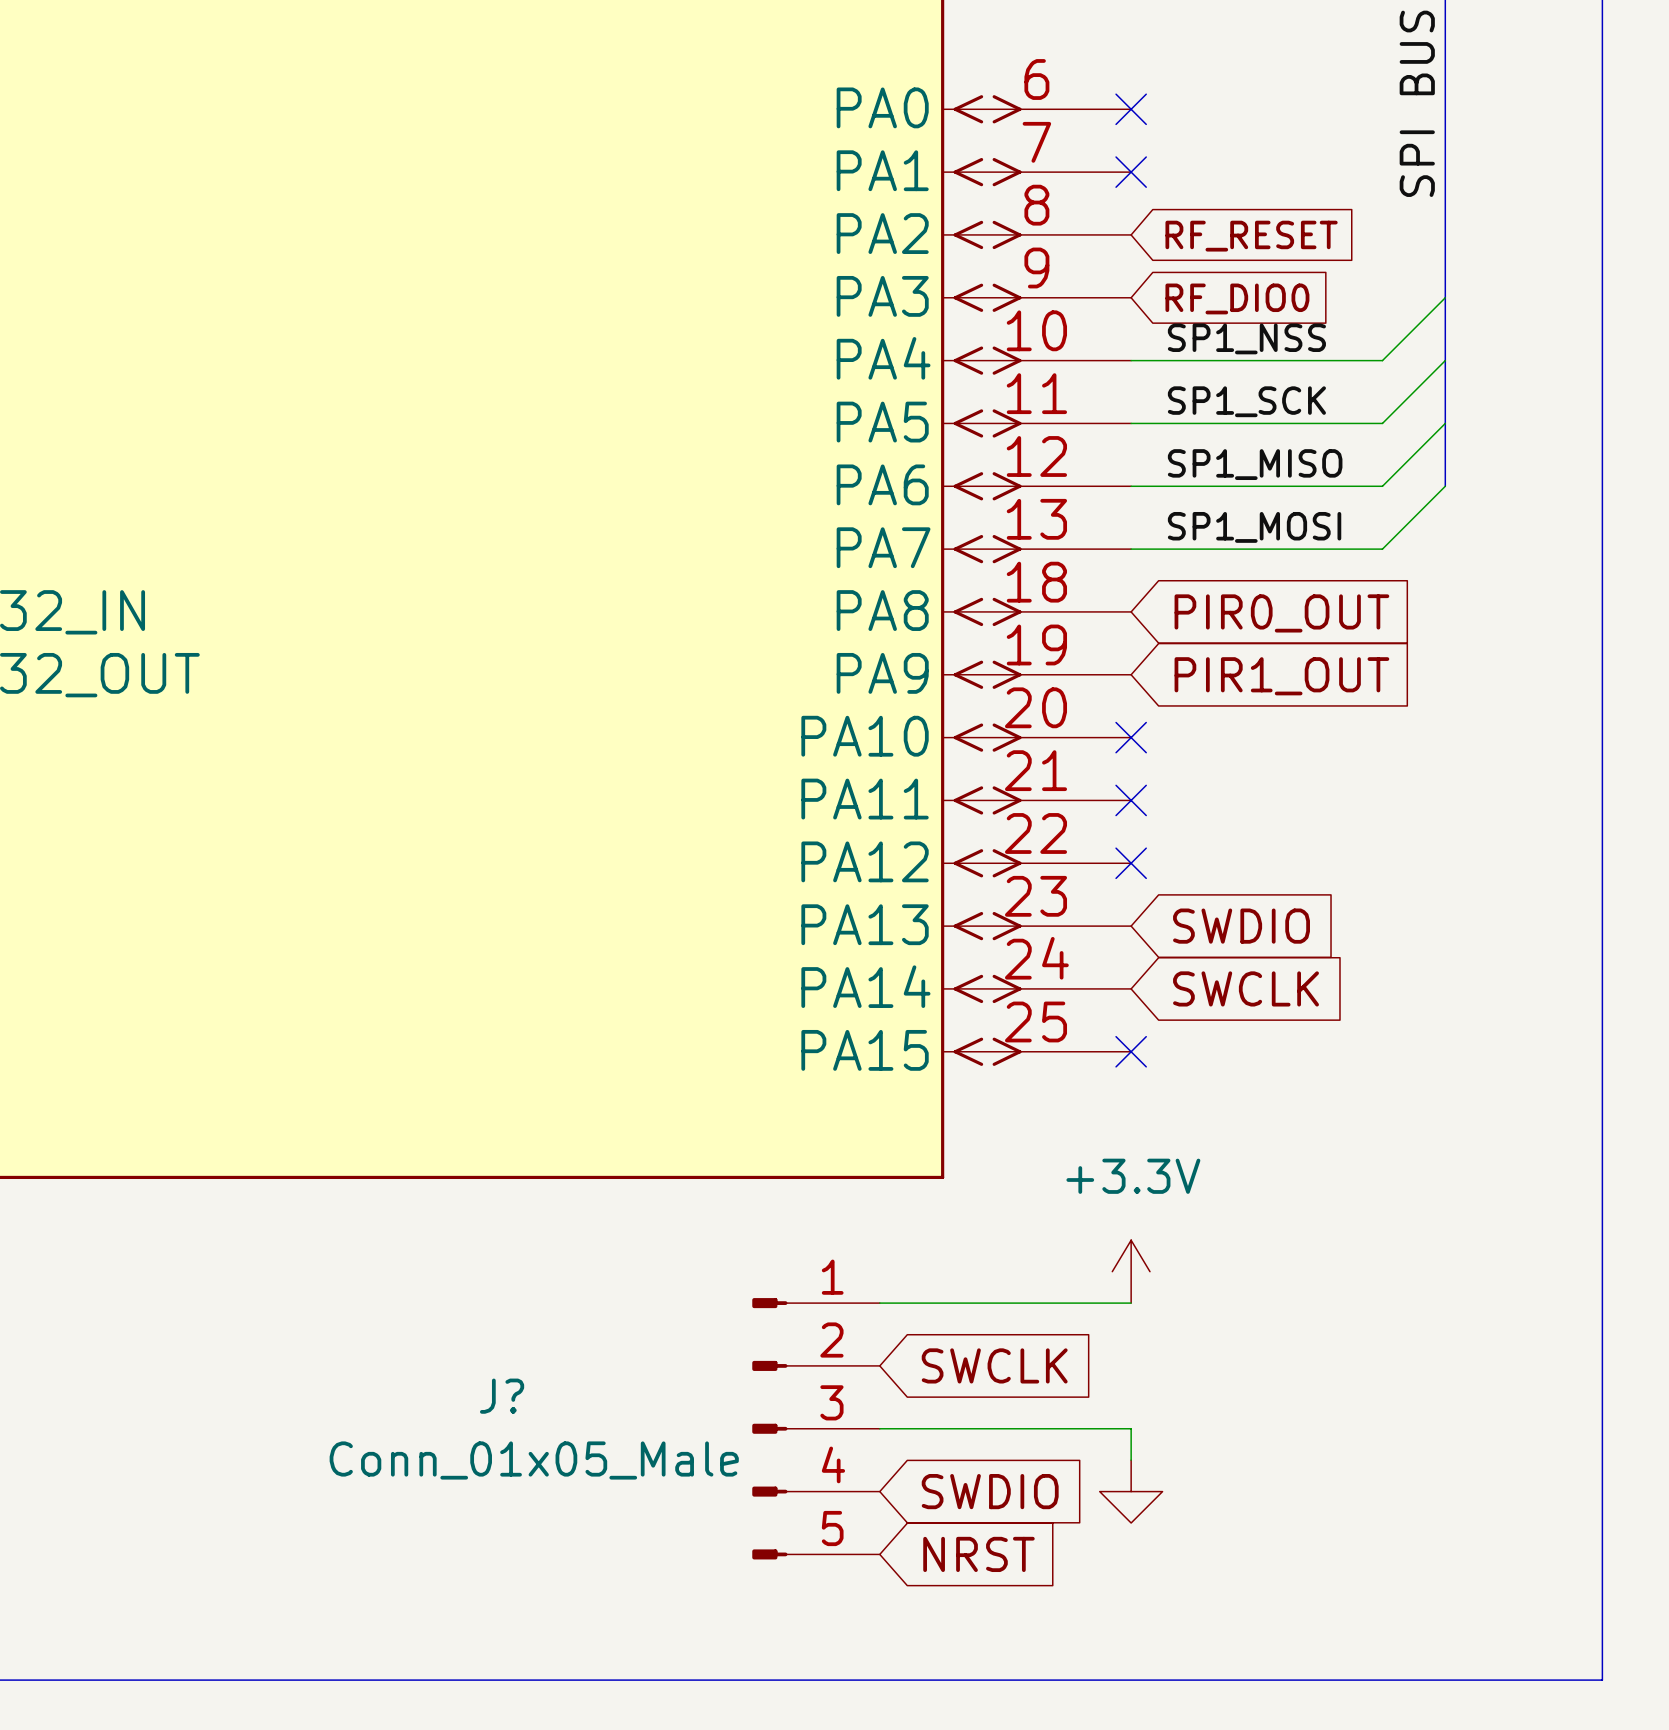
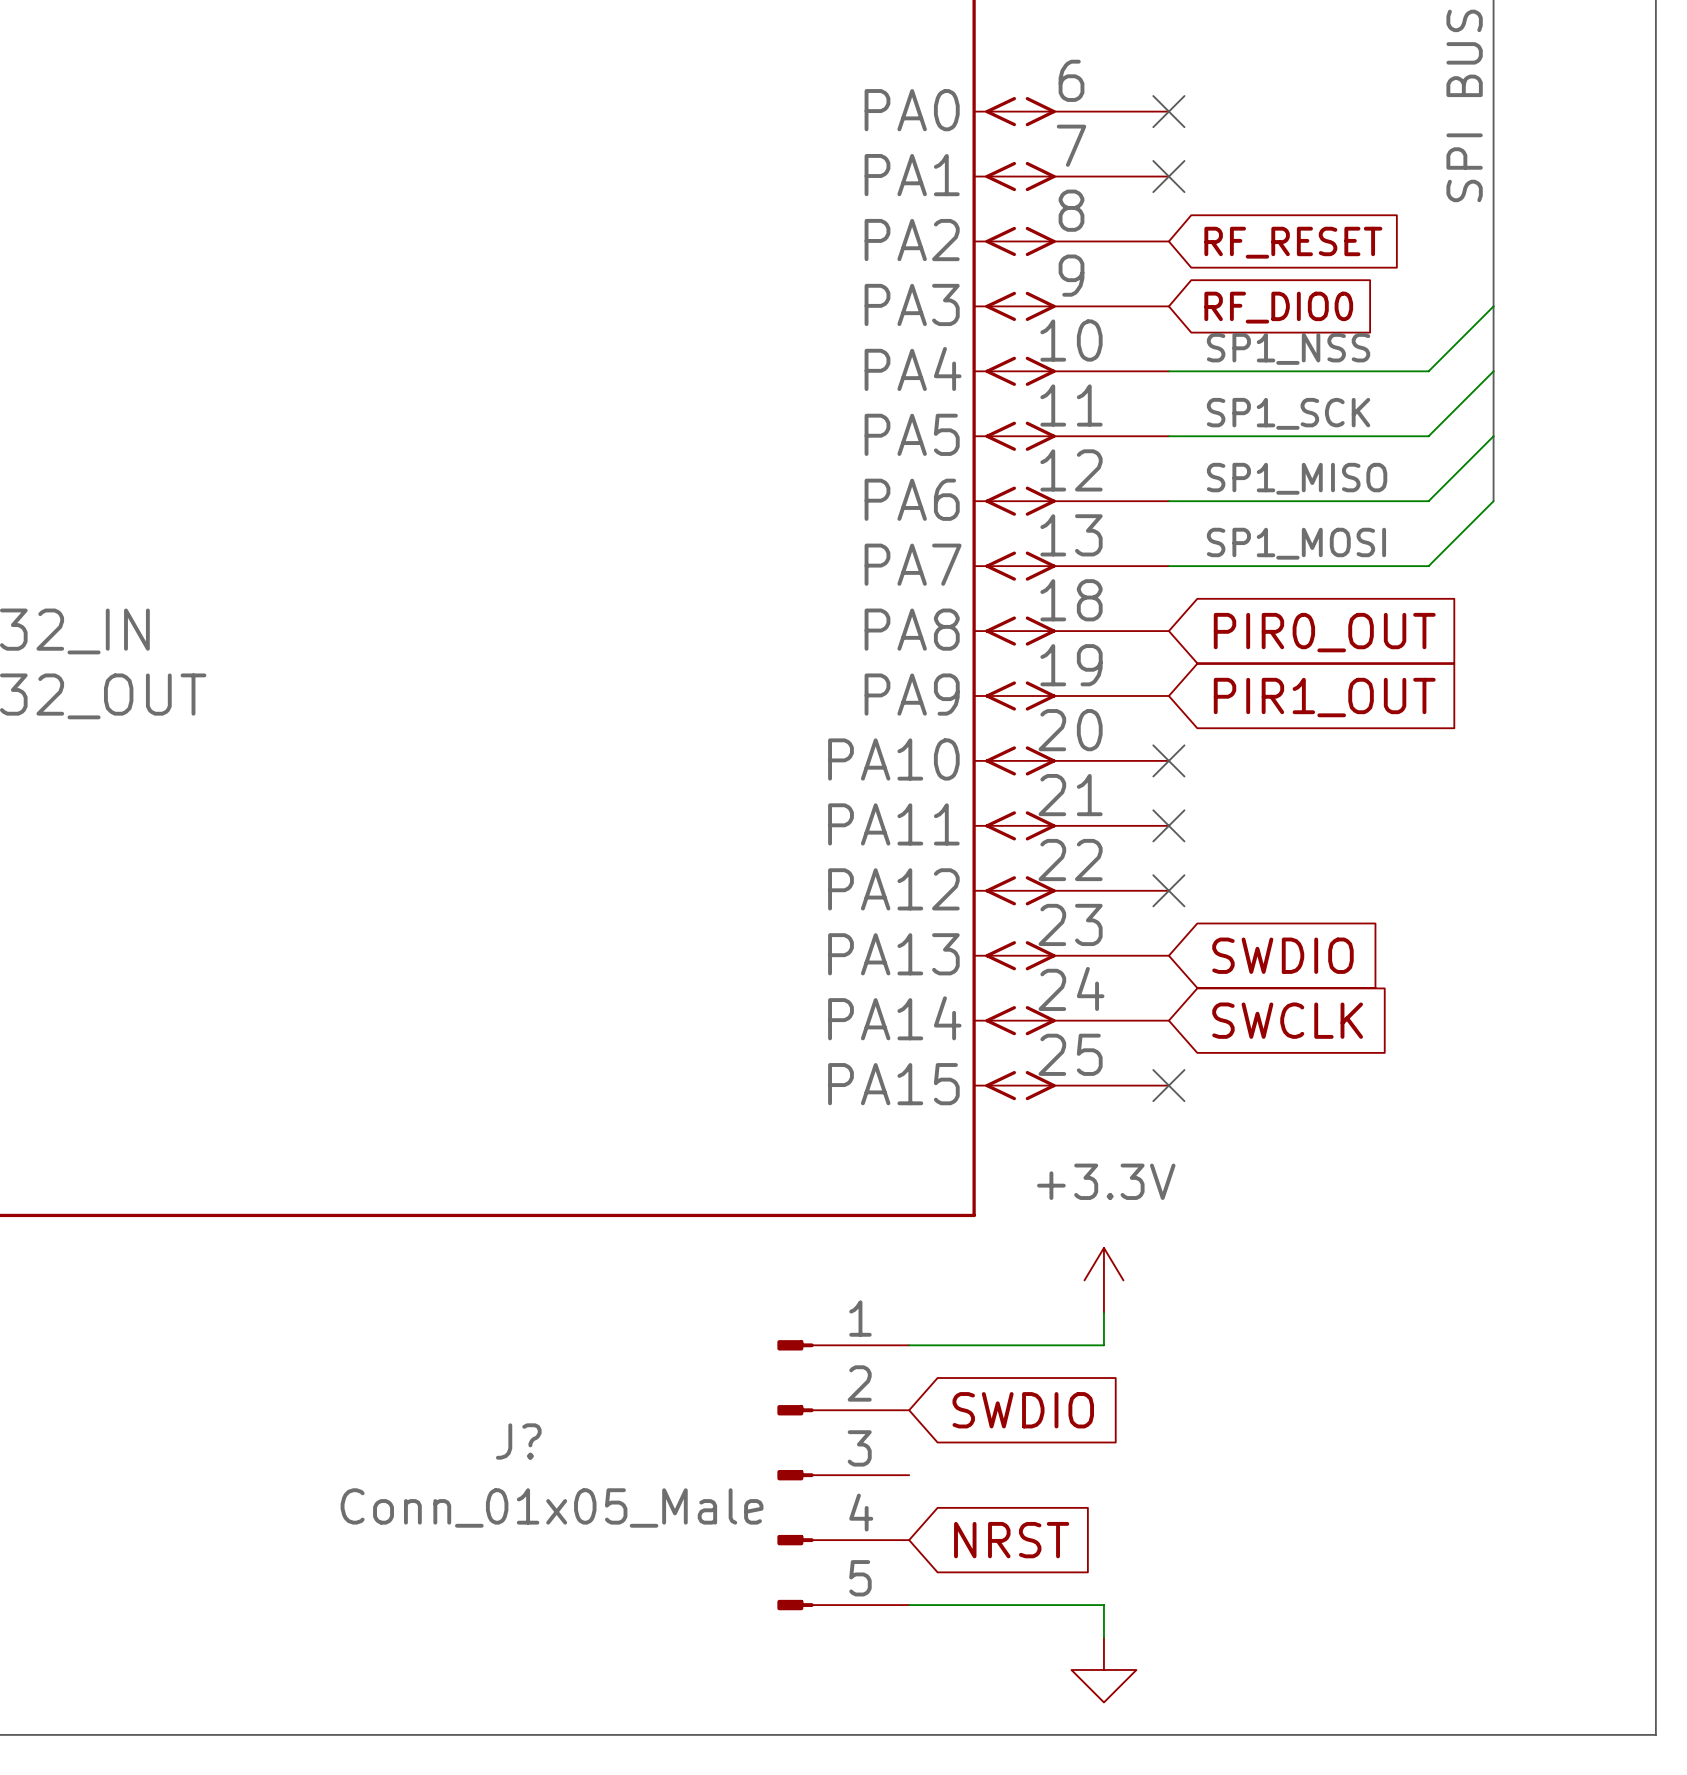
power symbol position: +3.3V (1131, 1271) -> +3.3V (1103, 1280)
wire: (1068, 1303) (1131, 1303) -> (1103, 1345) (1103, 1312)
global label: SWCLK (994, 1365) -> SWDIO (1023, 1410)
wire: (879, 1428) (1131, 1428) (1131, 1460) -> none
global label: SWDIO (990, 1491) -> NRST (1011, 1540)
power symbol position: (1131, 1491) -> (1103, 1669)
wire: none -> (909, 1605) (1103, 1605) (1103, 1637)
global label: NRST (978, 1554) -> none

